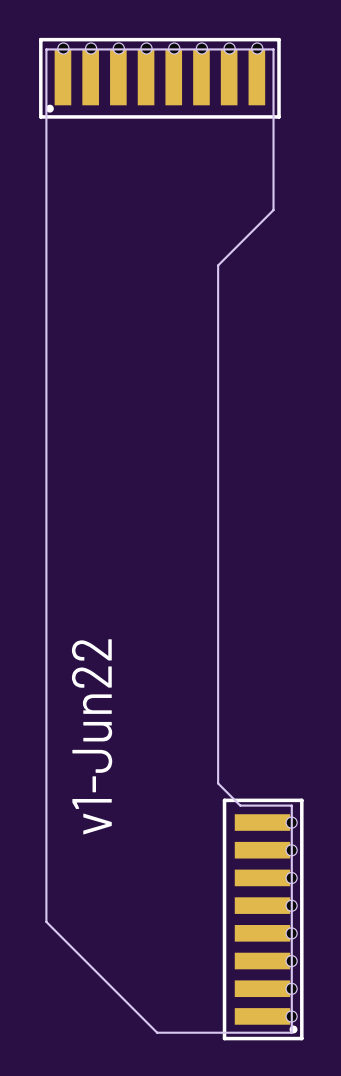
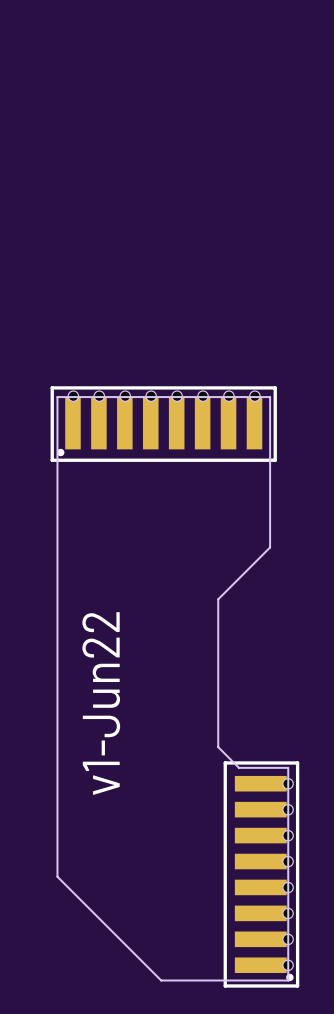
hole: (63, 48) -> none
hole: (91, 48) -> none
hole: (118, 48) -> none
hole: (146, 48) -> none
hole: (174, 48) -> none
hole: (201, 48) -> none
hole: (229, 48) -> none
hole: (257, 48) -> none
part position: (159, 78) -> (163, 424)
hole: none -> (73, 396)
hole: none -> (99, 396)
hole: none -> (125, 396)
hole: none -> (151, 396)
hole: none -> (177, 396)
hole: none -> (203, 396)
hole: none -> (228, 396)
hole: none -> (254, 396)
board edge: (240, 805) (218, 783) (218, 265) (273, 210) (273, 49) (46, 49) (46, 921) (157, 1032) -> (240, 767) (218, 747) (218, 599) (270, 547) (270, 397) (57, 397) (57, 876) (162, 980)

